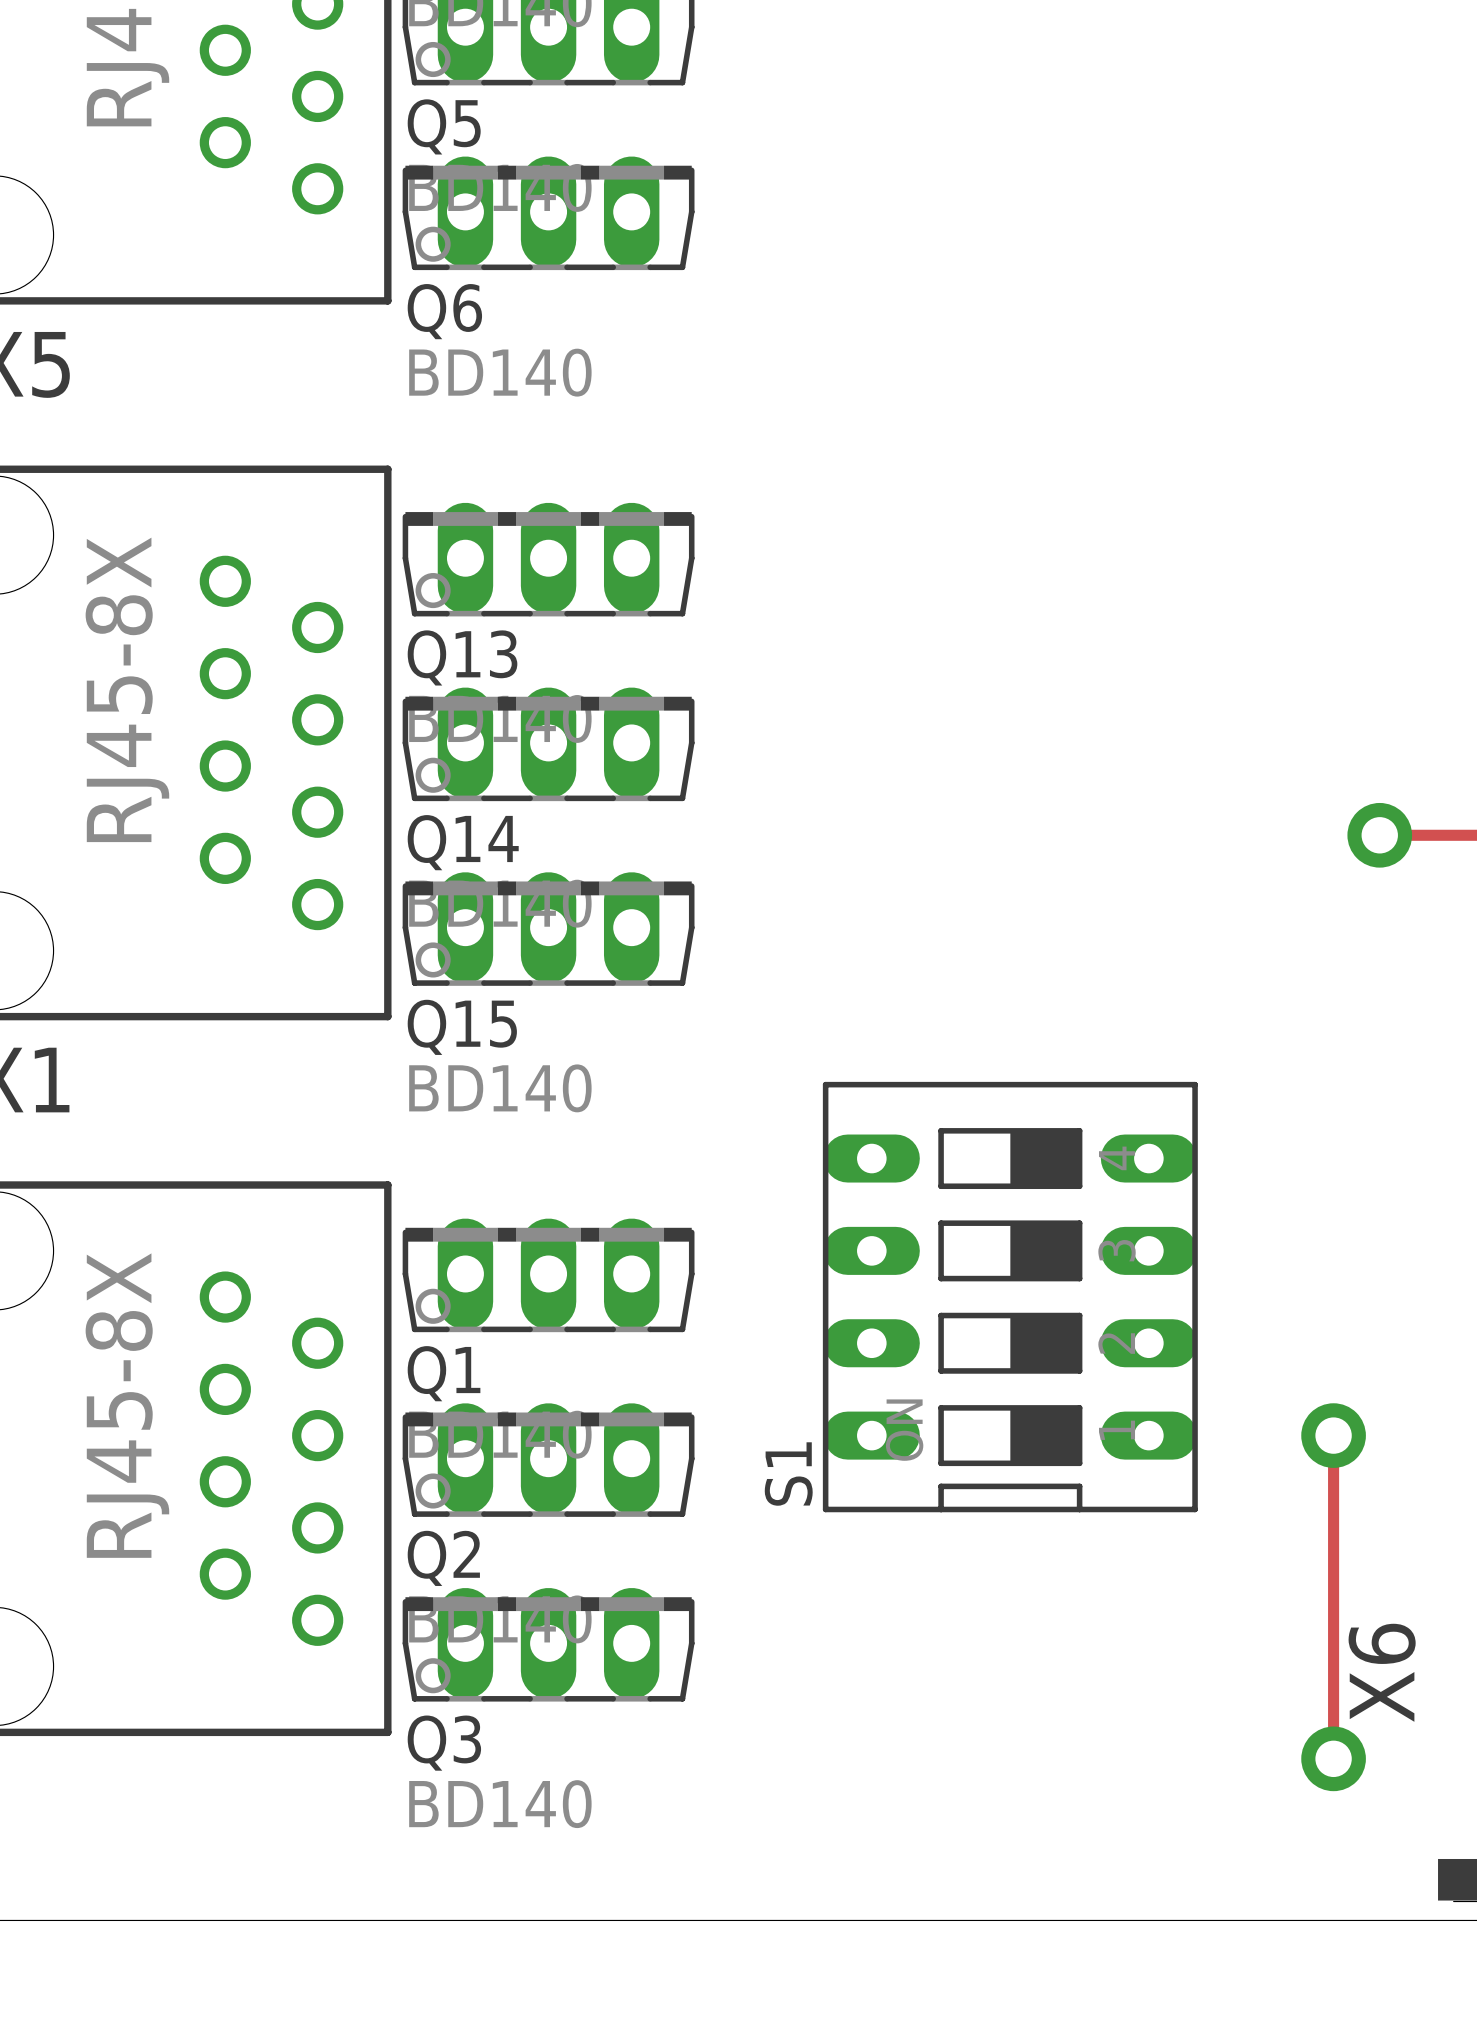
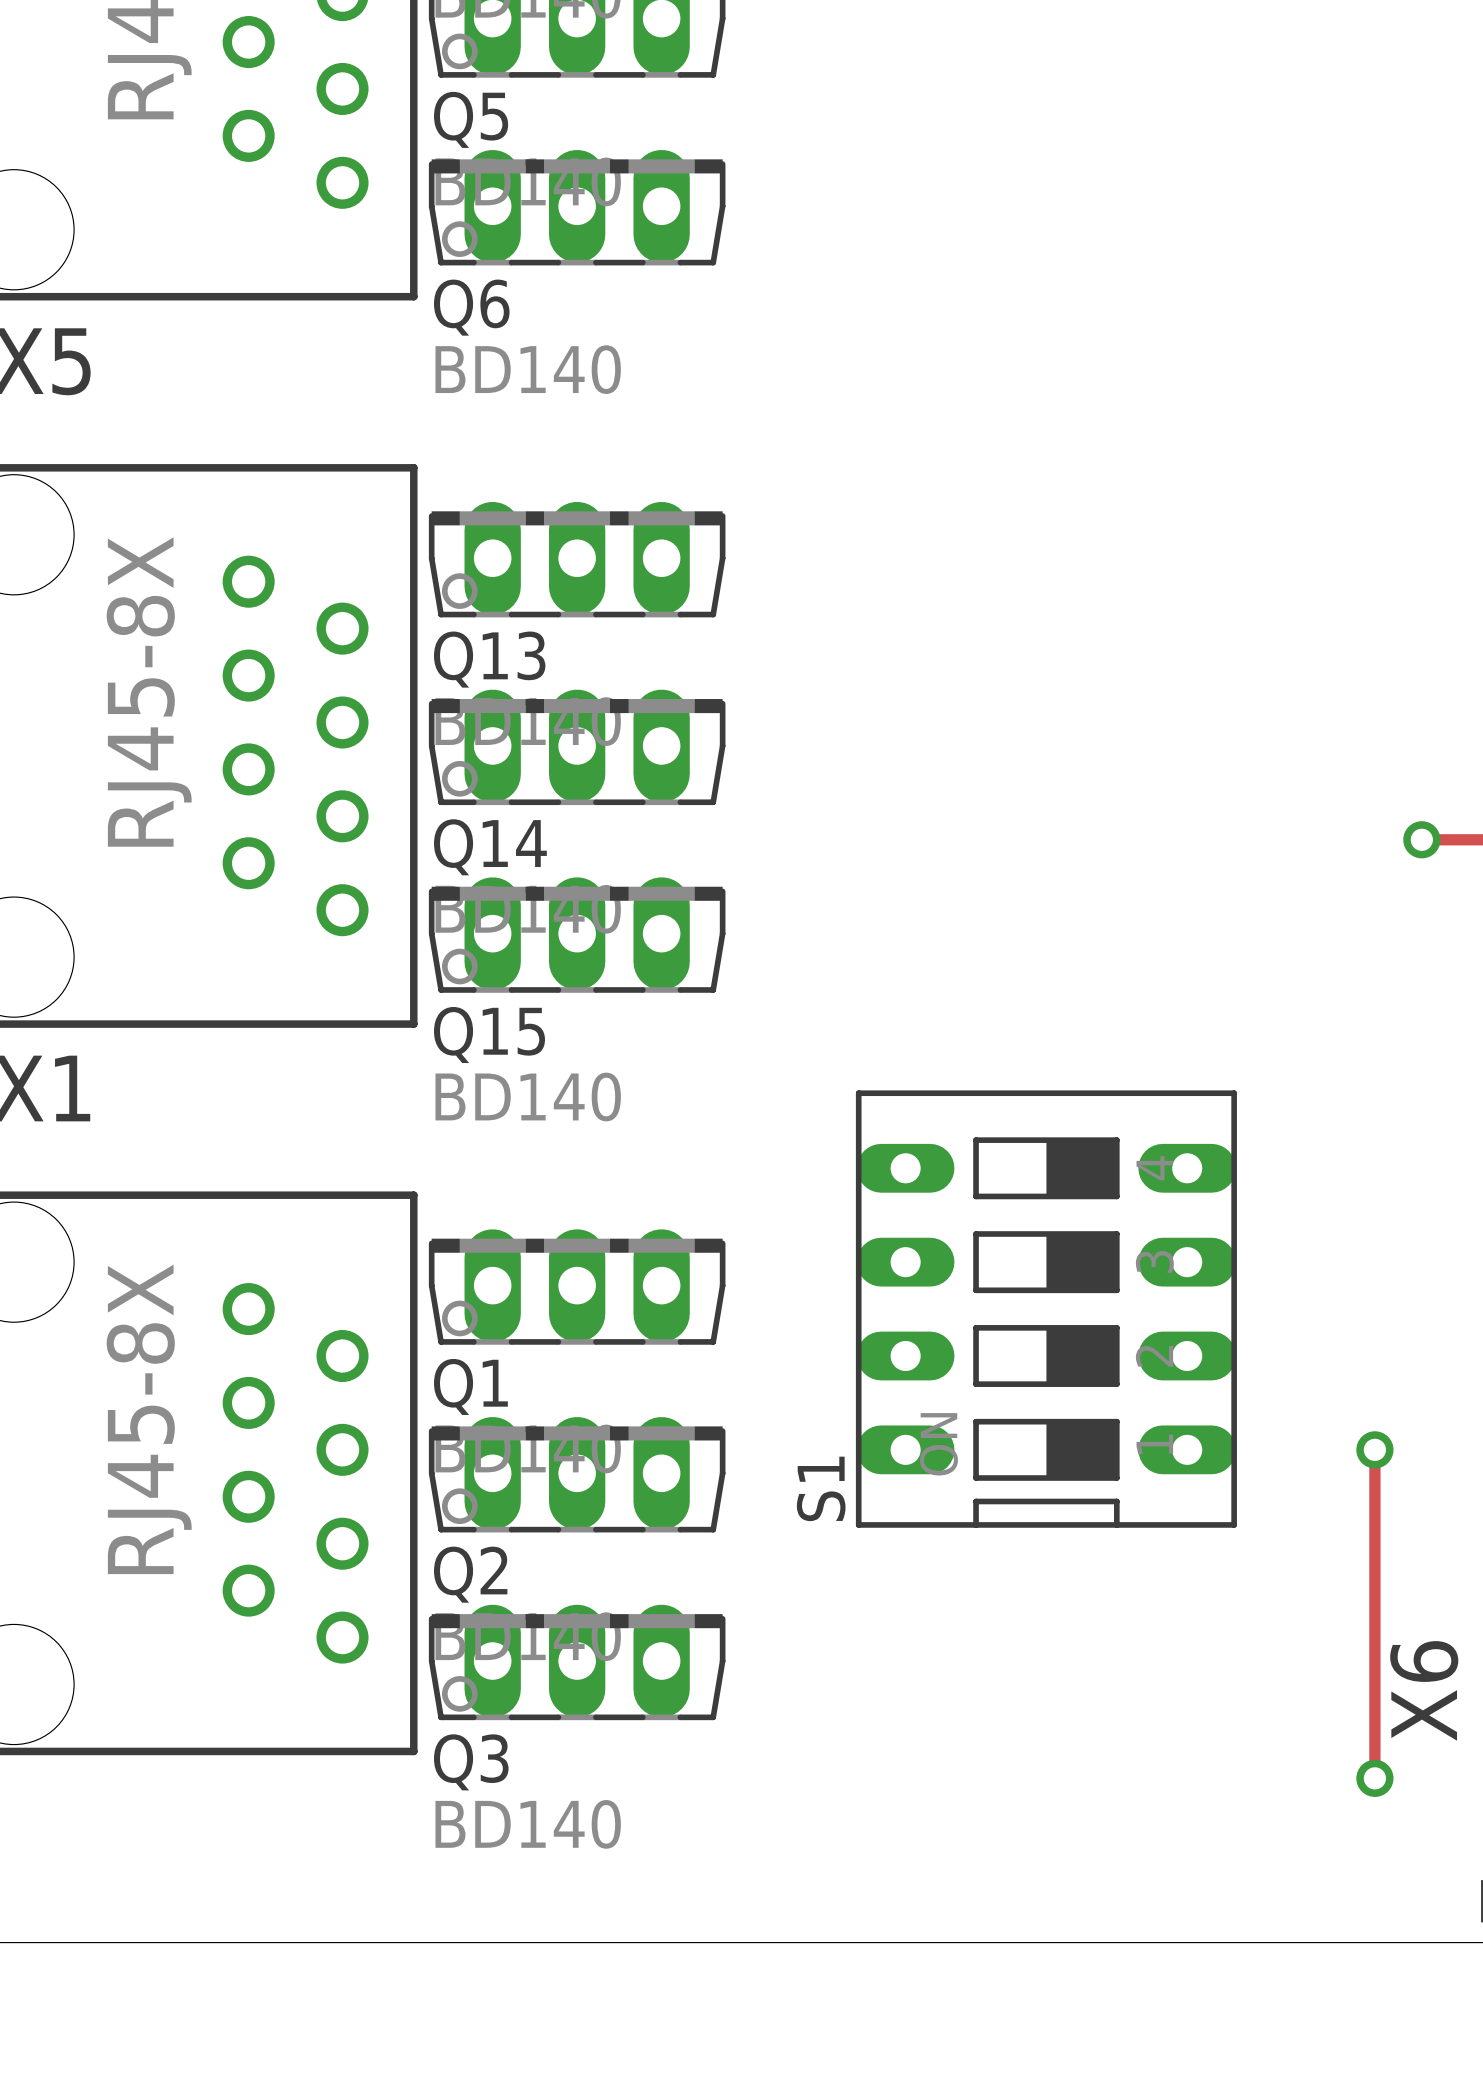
via size: [1347, 802, 1413, 868] -> [1403, 821, 1441, 859]
via size: [1301, 1403, 1366, 1468] -> [1356, 1431, 1394, 1469]
via size: [1301, 1726, 1366, 1792] -> [1356, 1759, 1394, 1797]

